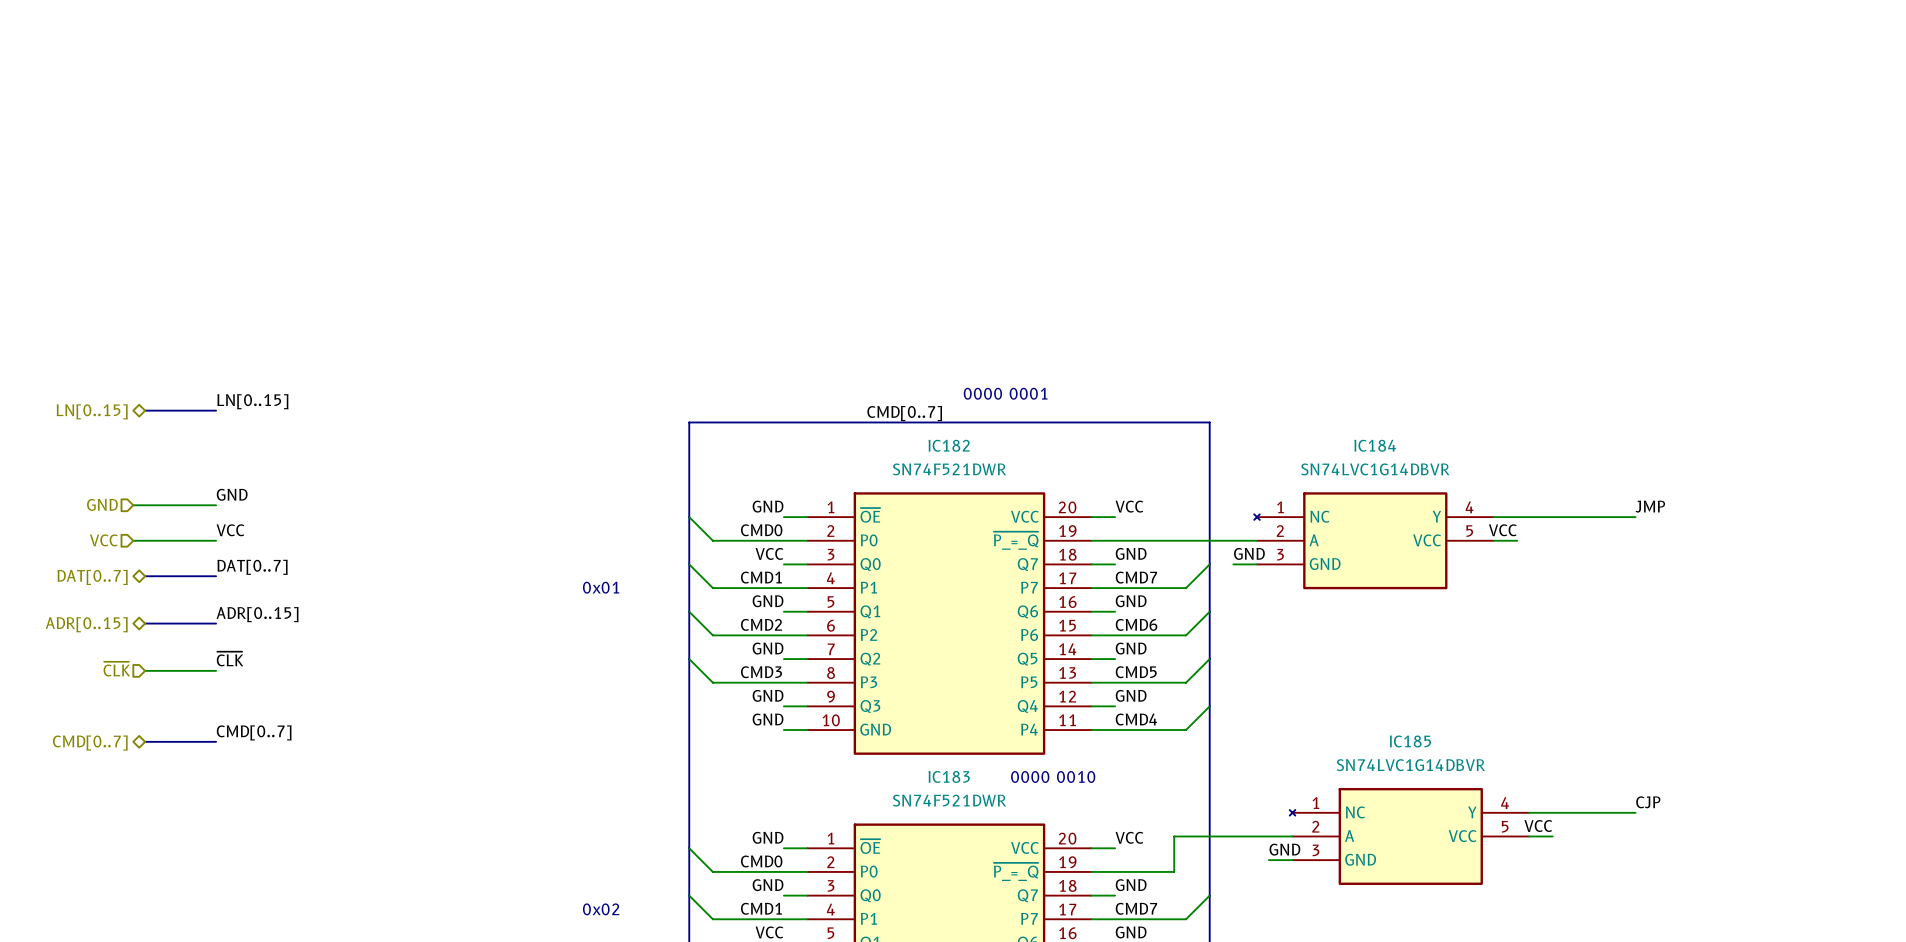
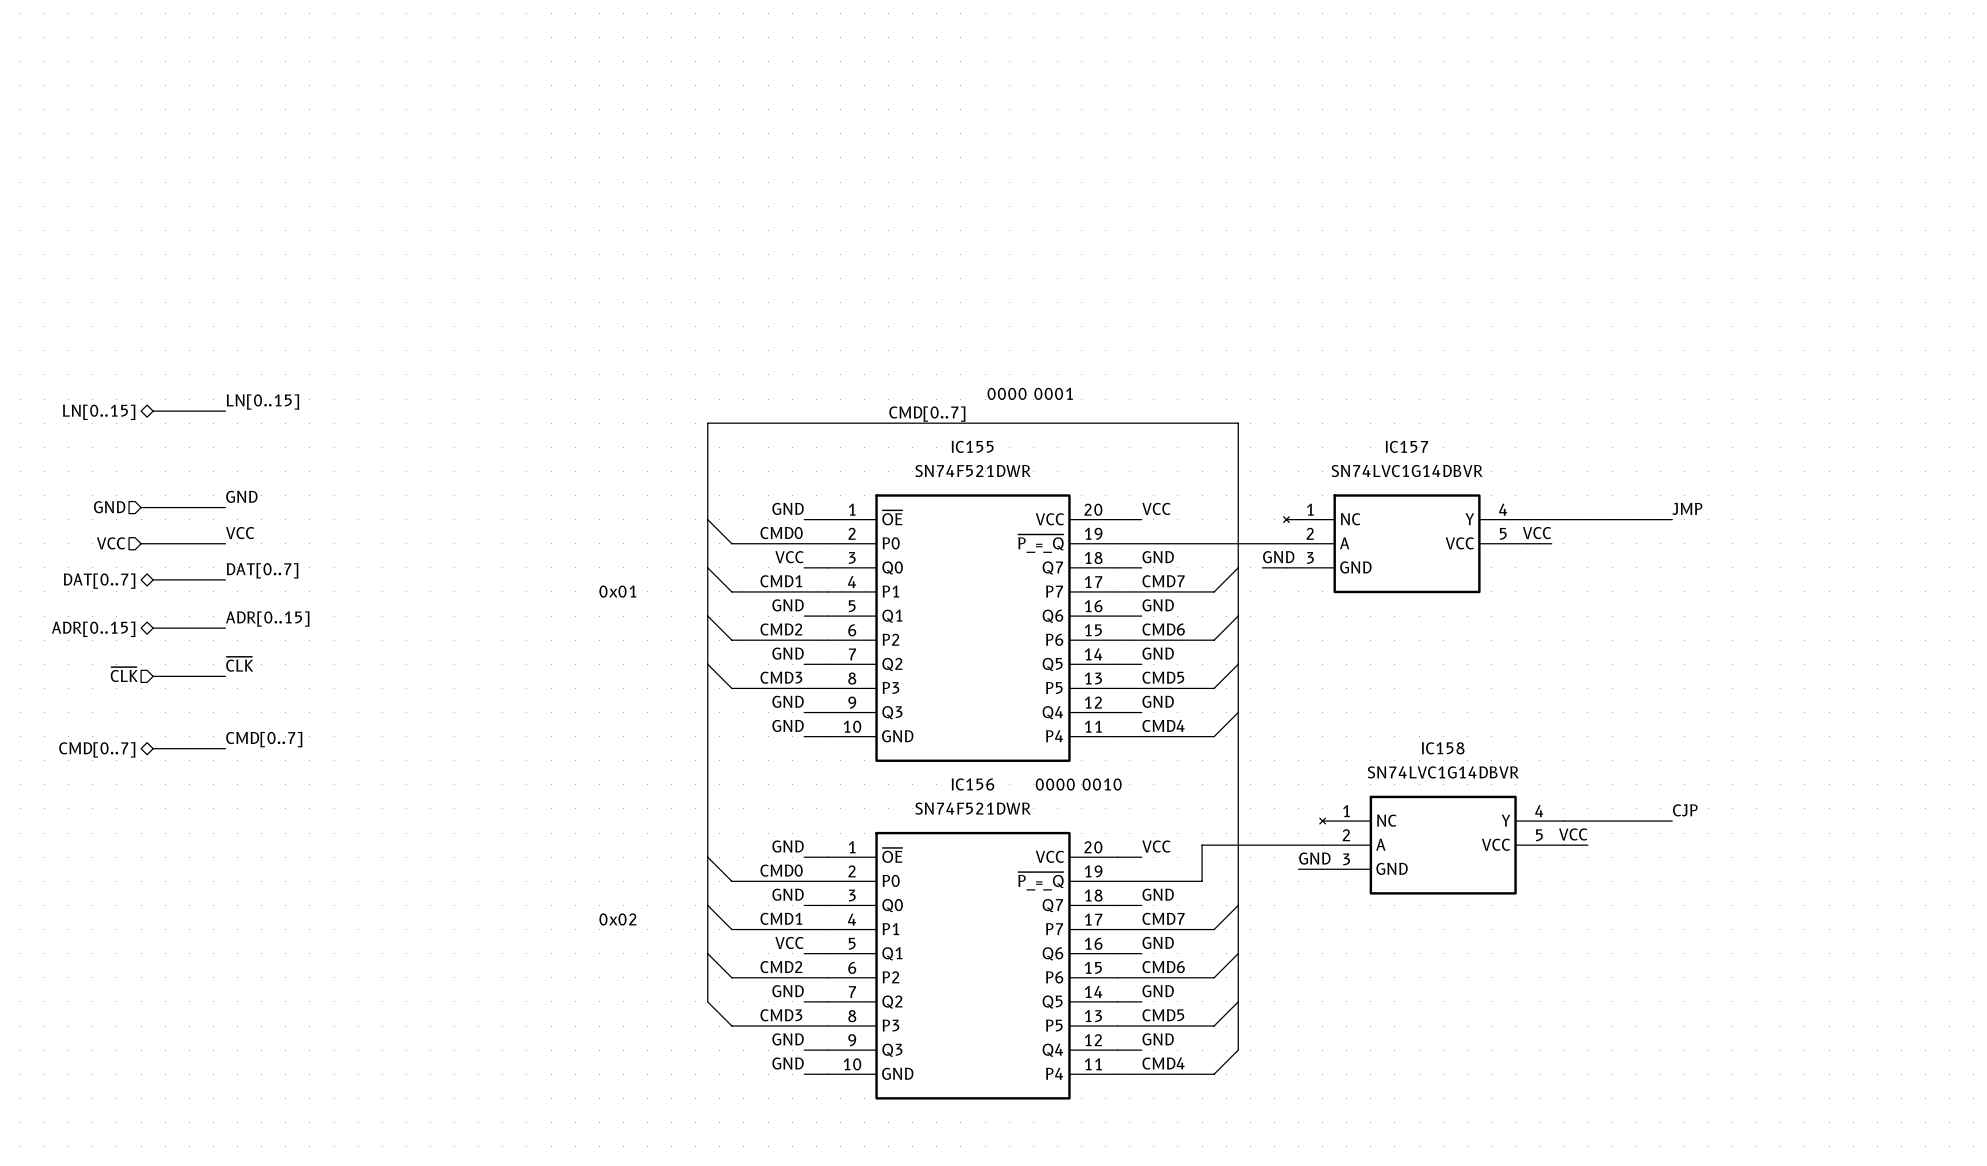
IC182 name: IC182 (949, 445) -> IC155 (972, 446)
IC184 name: IC184 (1375, 445) -> IC157 (1406, 446)
IC185 name: IC185 (1410, 741) -> IC158 (1443, 748)
IC183 name: IC183 (949, 776) -> IC156 (972, 784)

